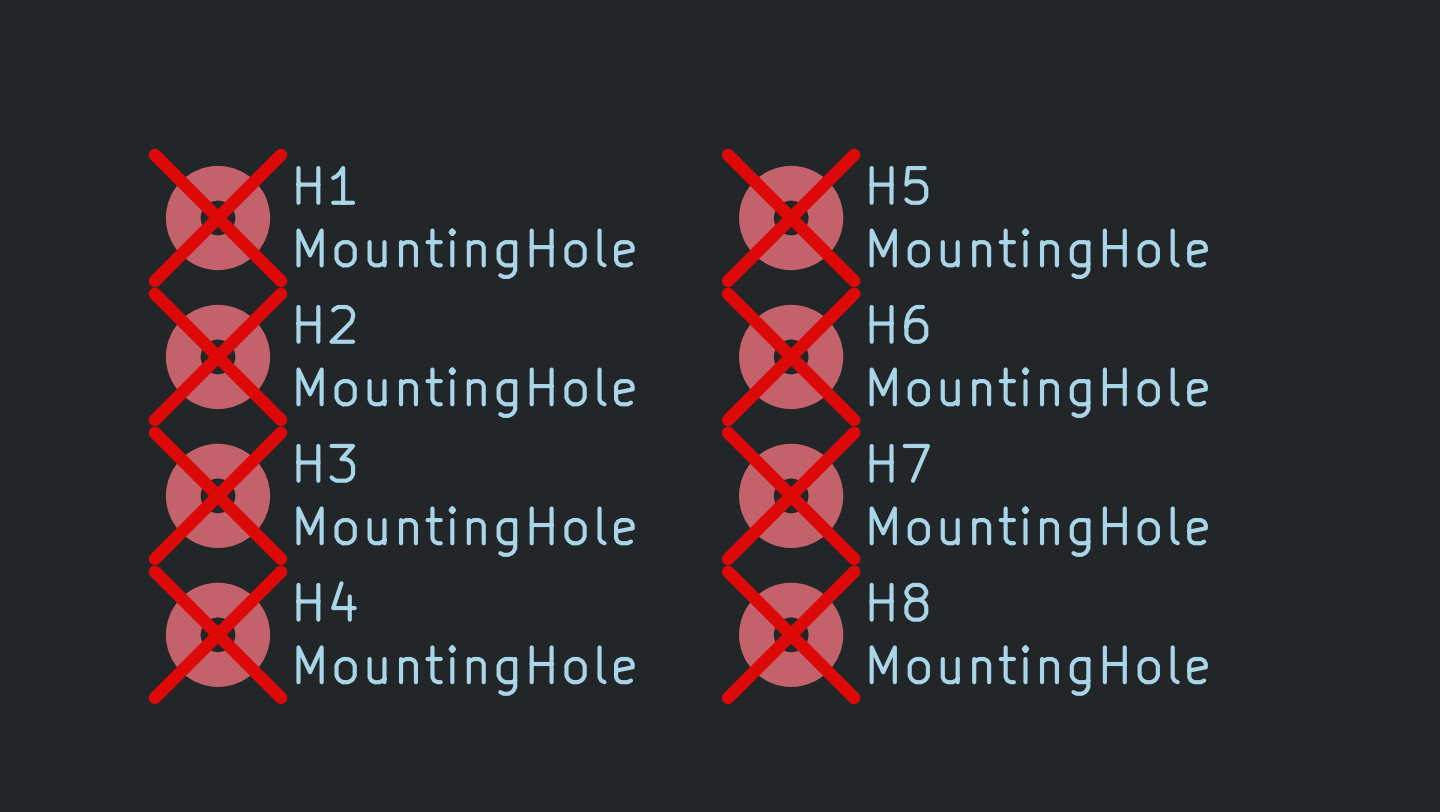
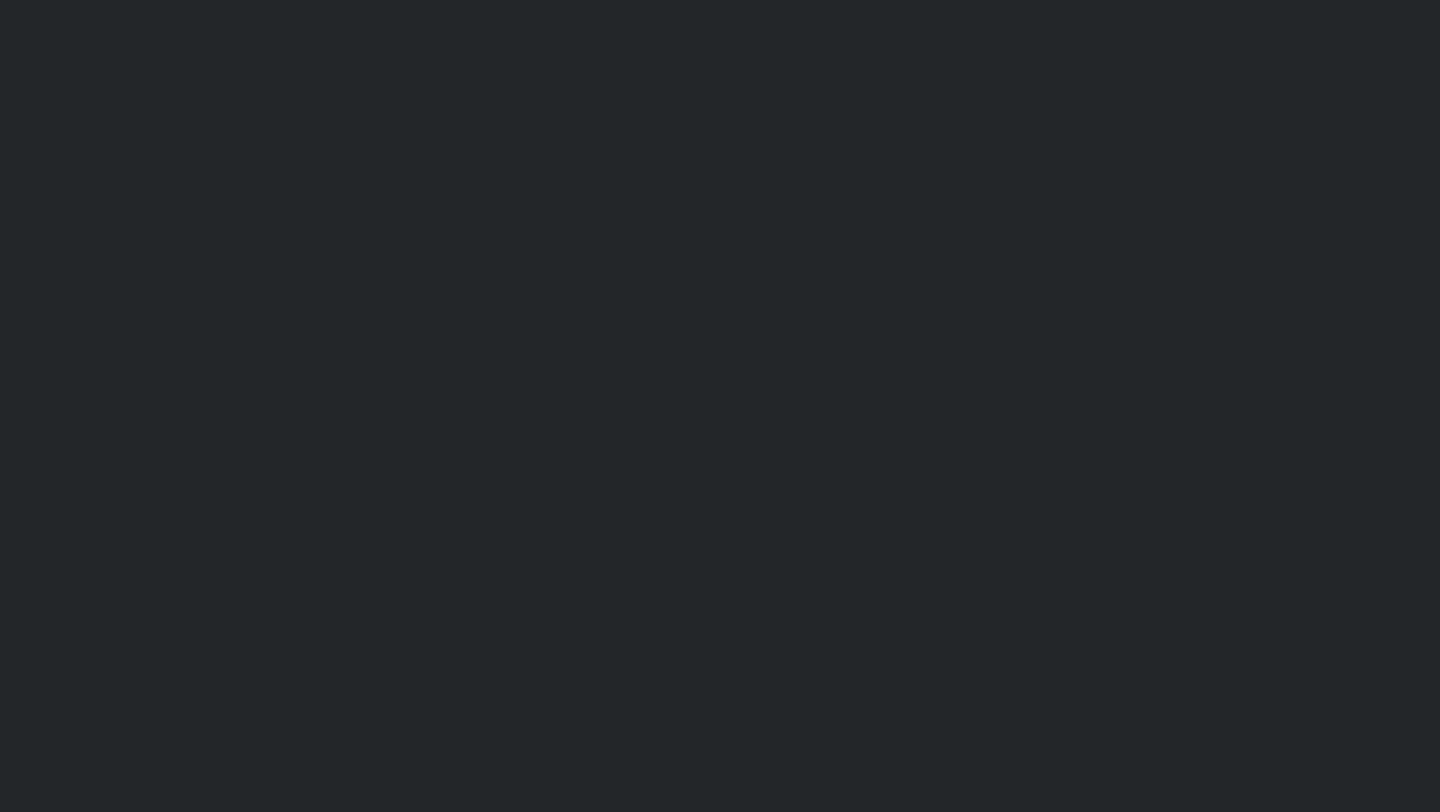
H1: MountingHole (217, 217) -> none
H5: MountingHole (791, 217) -> none
H2: MountingHole (217, 356) -> none
H6: MountingHole (791, 356) -> none
H3: MountingHole (217, 495) -> none
H7: MountingHole (791, 495) -> none
H4: MountingHole (217, 634) -> none
H8: MountingHole (791, 634) -> none

